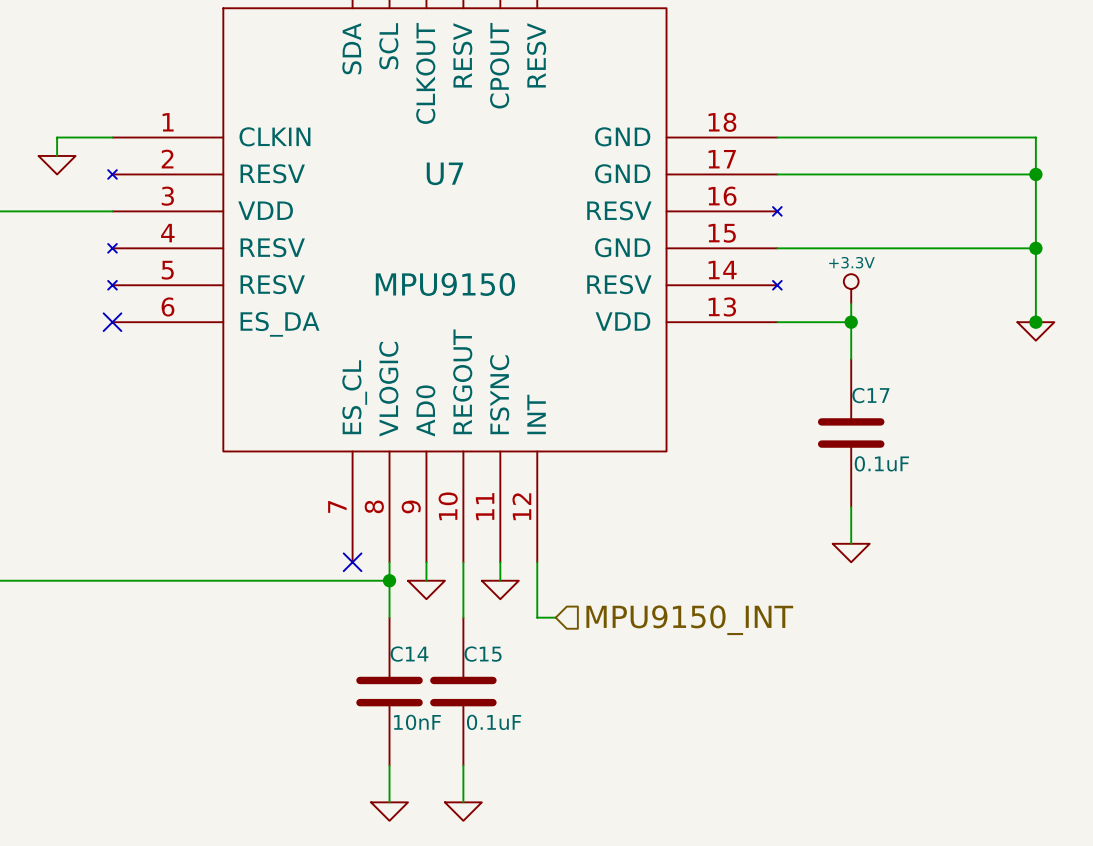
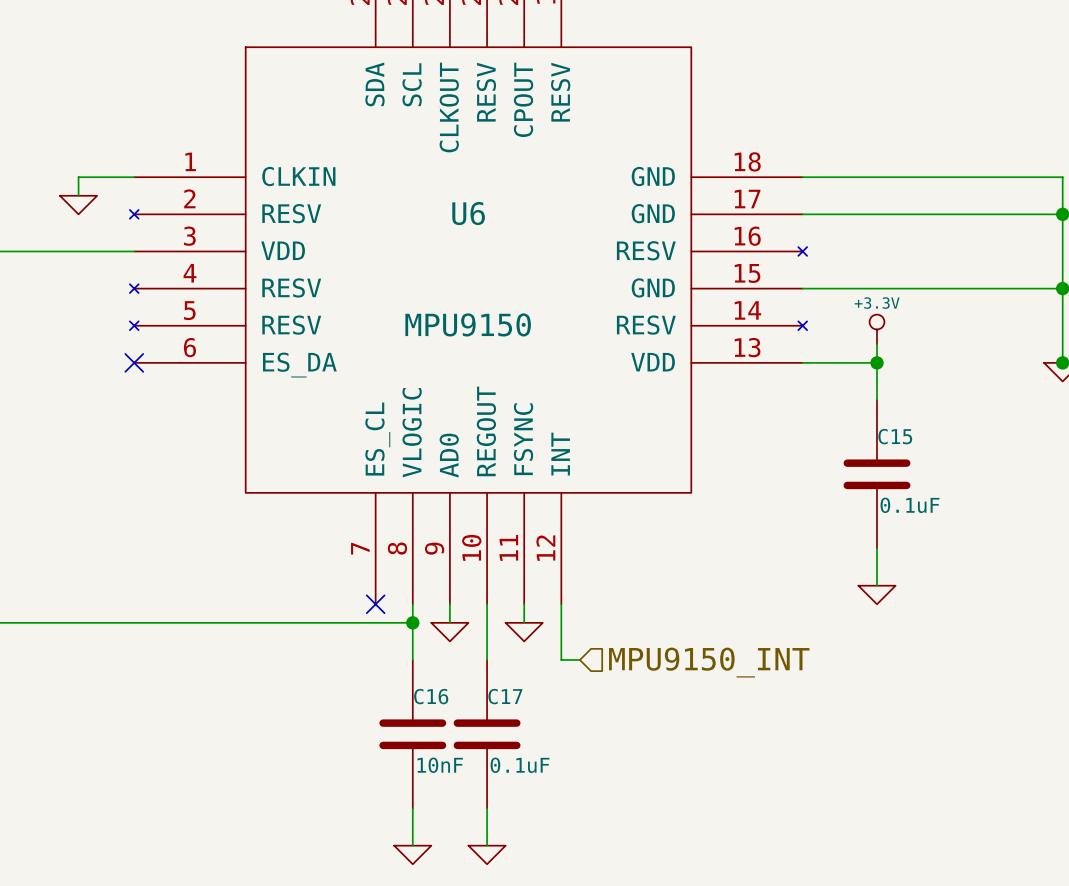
U7 name: U7 (444, 173) -> U6 (468, 213)
C17 name: C17 (870, 395) -> C15 (895, 436)
C14 name: C14 (409, 654) -> C16 (431, 696)
C15 name: C15 (483, 654) -> C17 (505, 696)

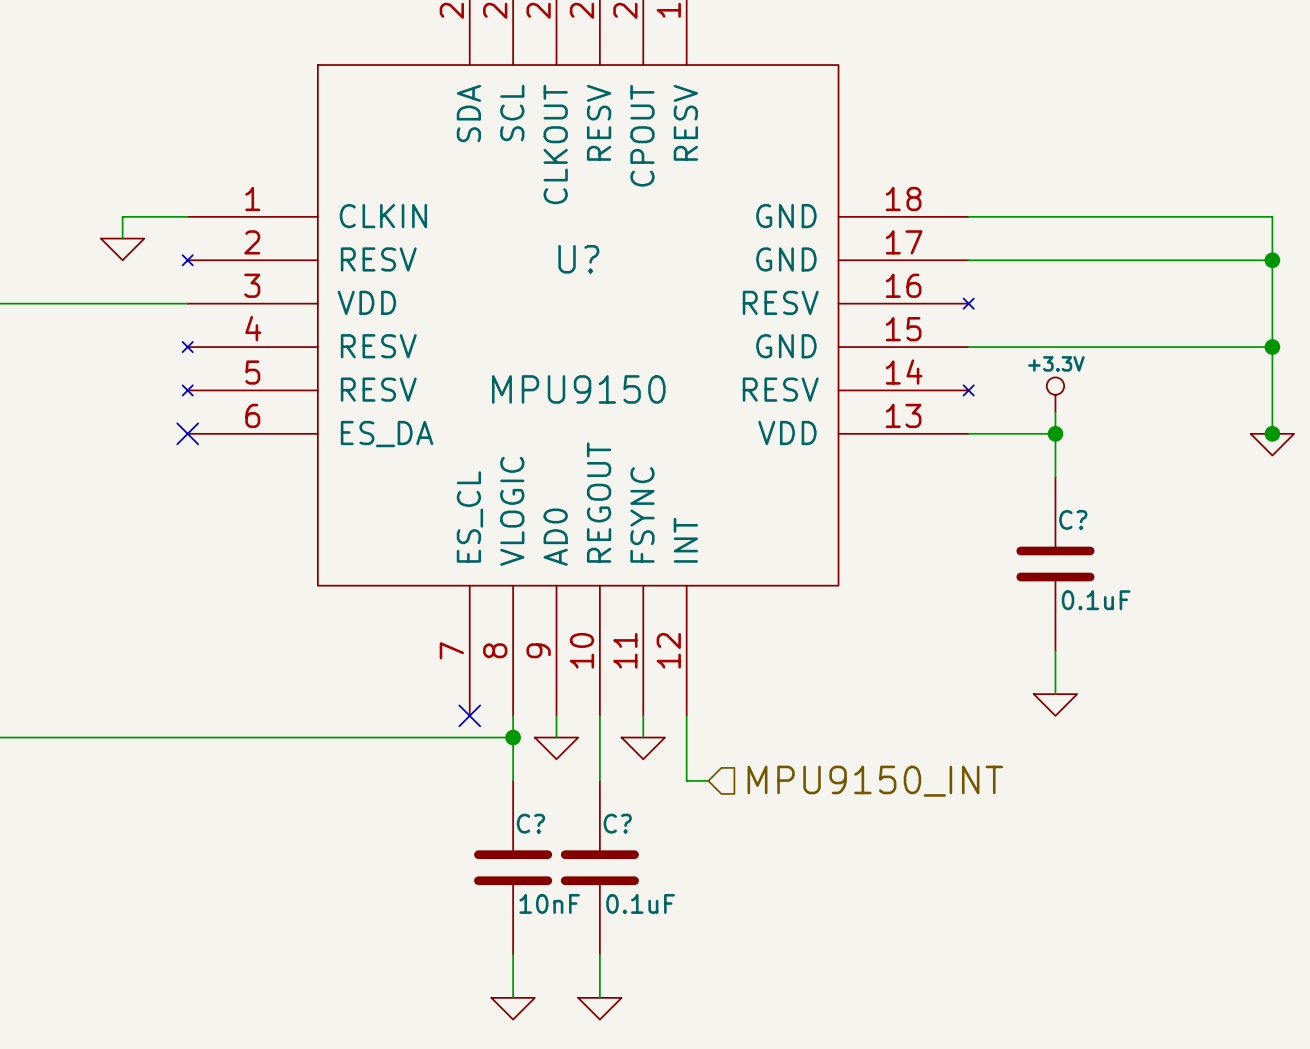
U6 name: U6 (468, 213) -> U? (578, 259)
C15 name: C15 (895, 436) -> C? (1073, 519)
C16 name: C16 (431, 696) -> C? (530, 823)
C17 name: C17 (505, 696) -> C? (617, 823)

